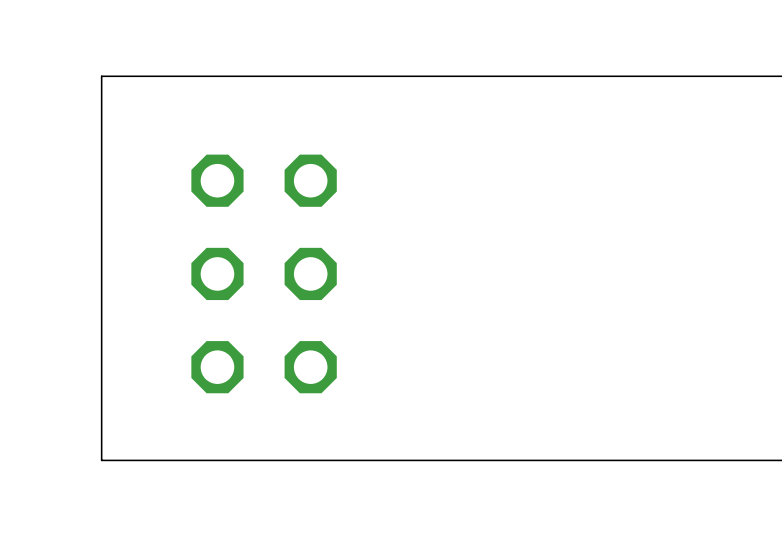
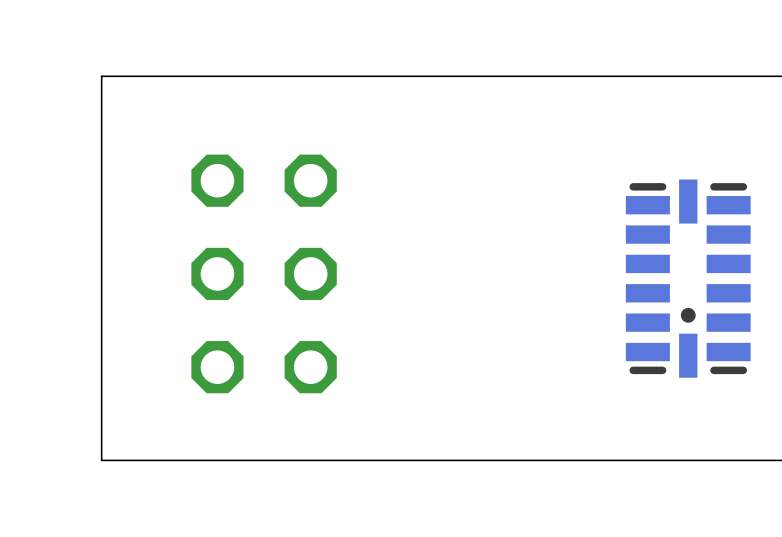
part: none -> (688, 278)

